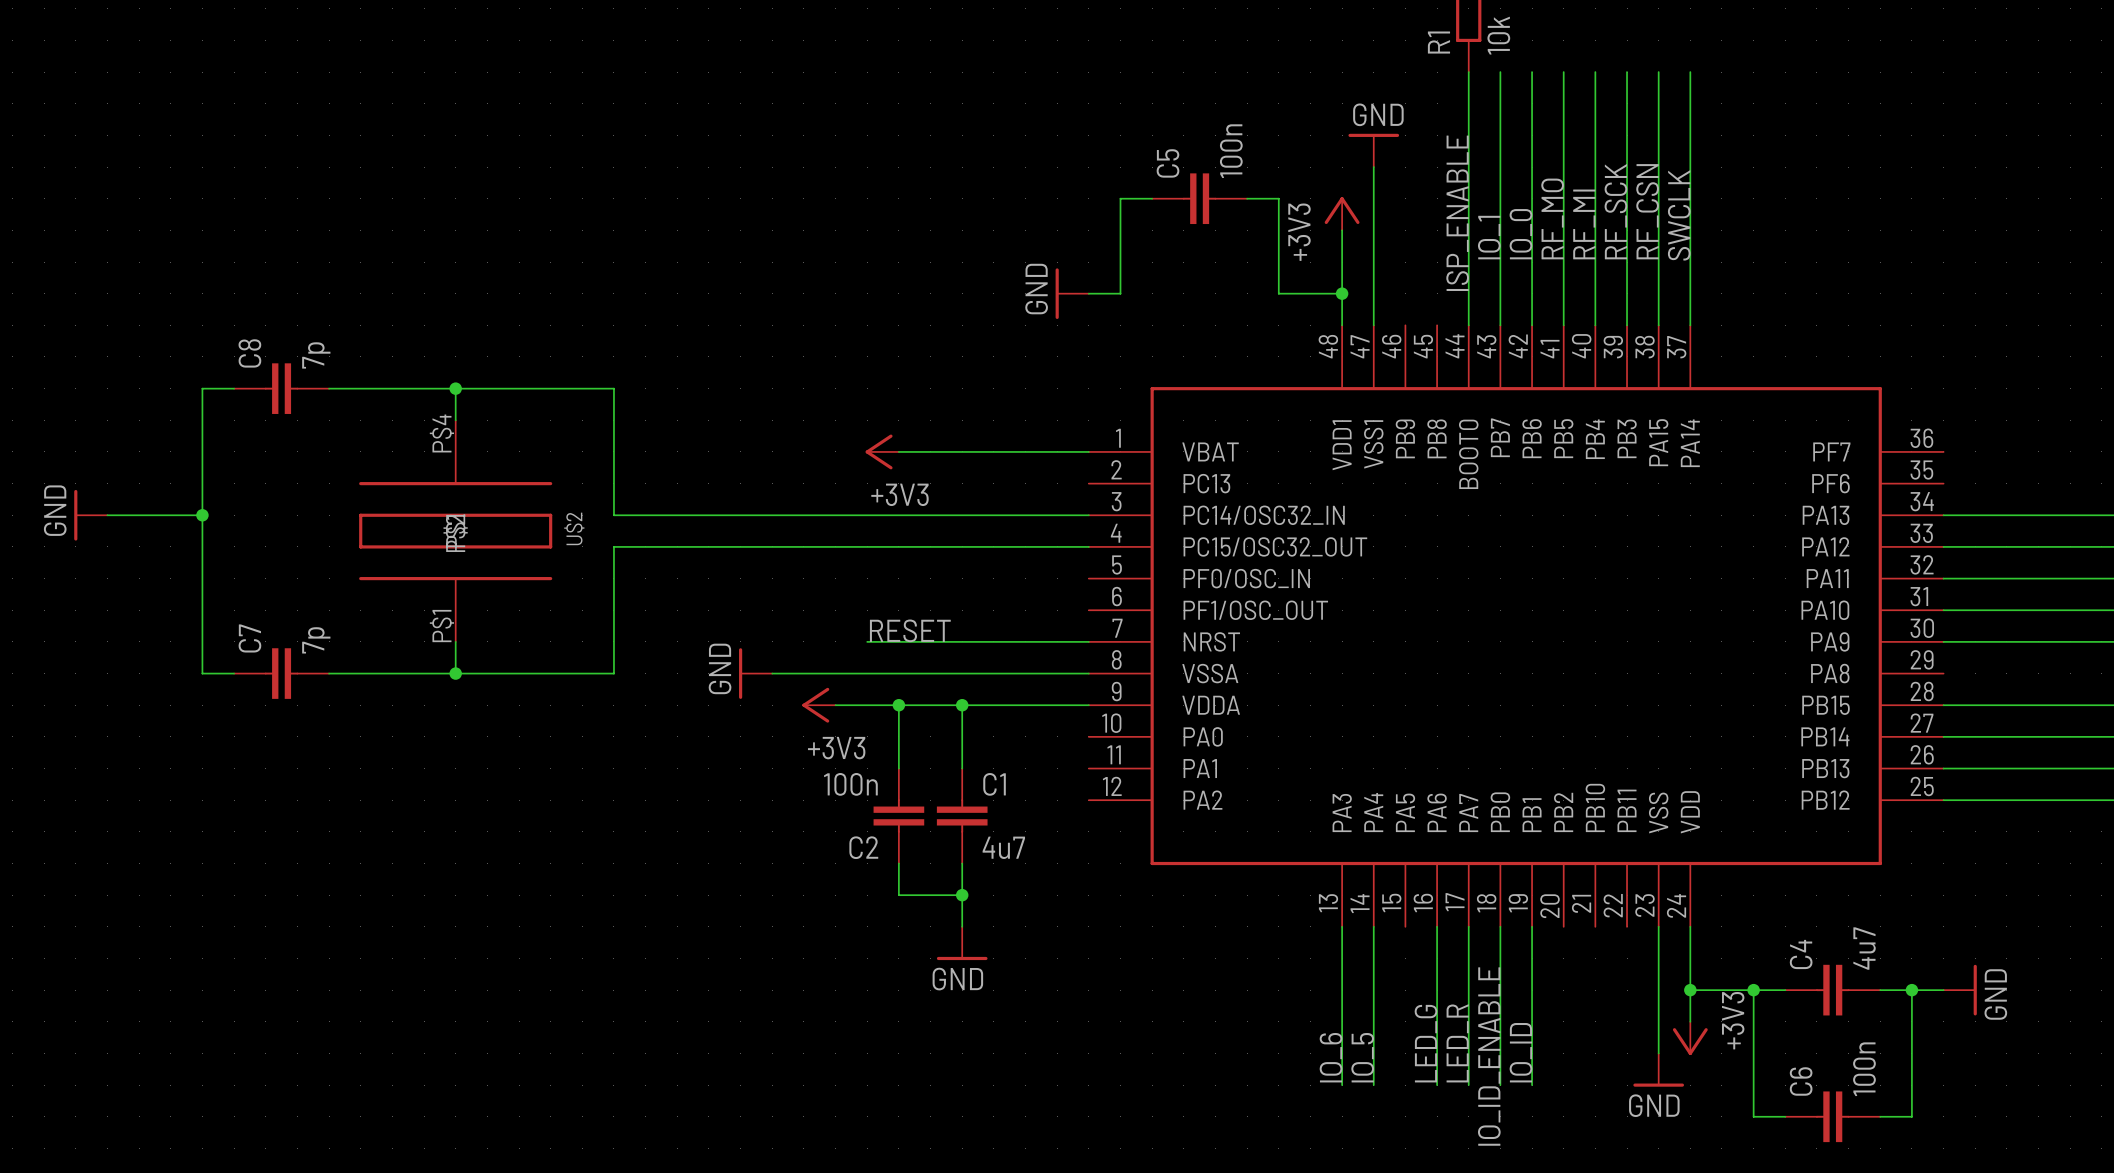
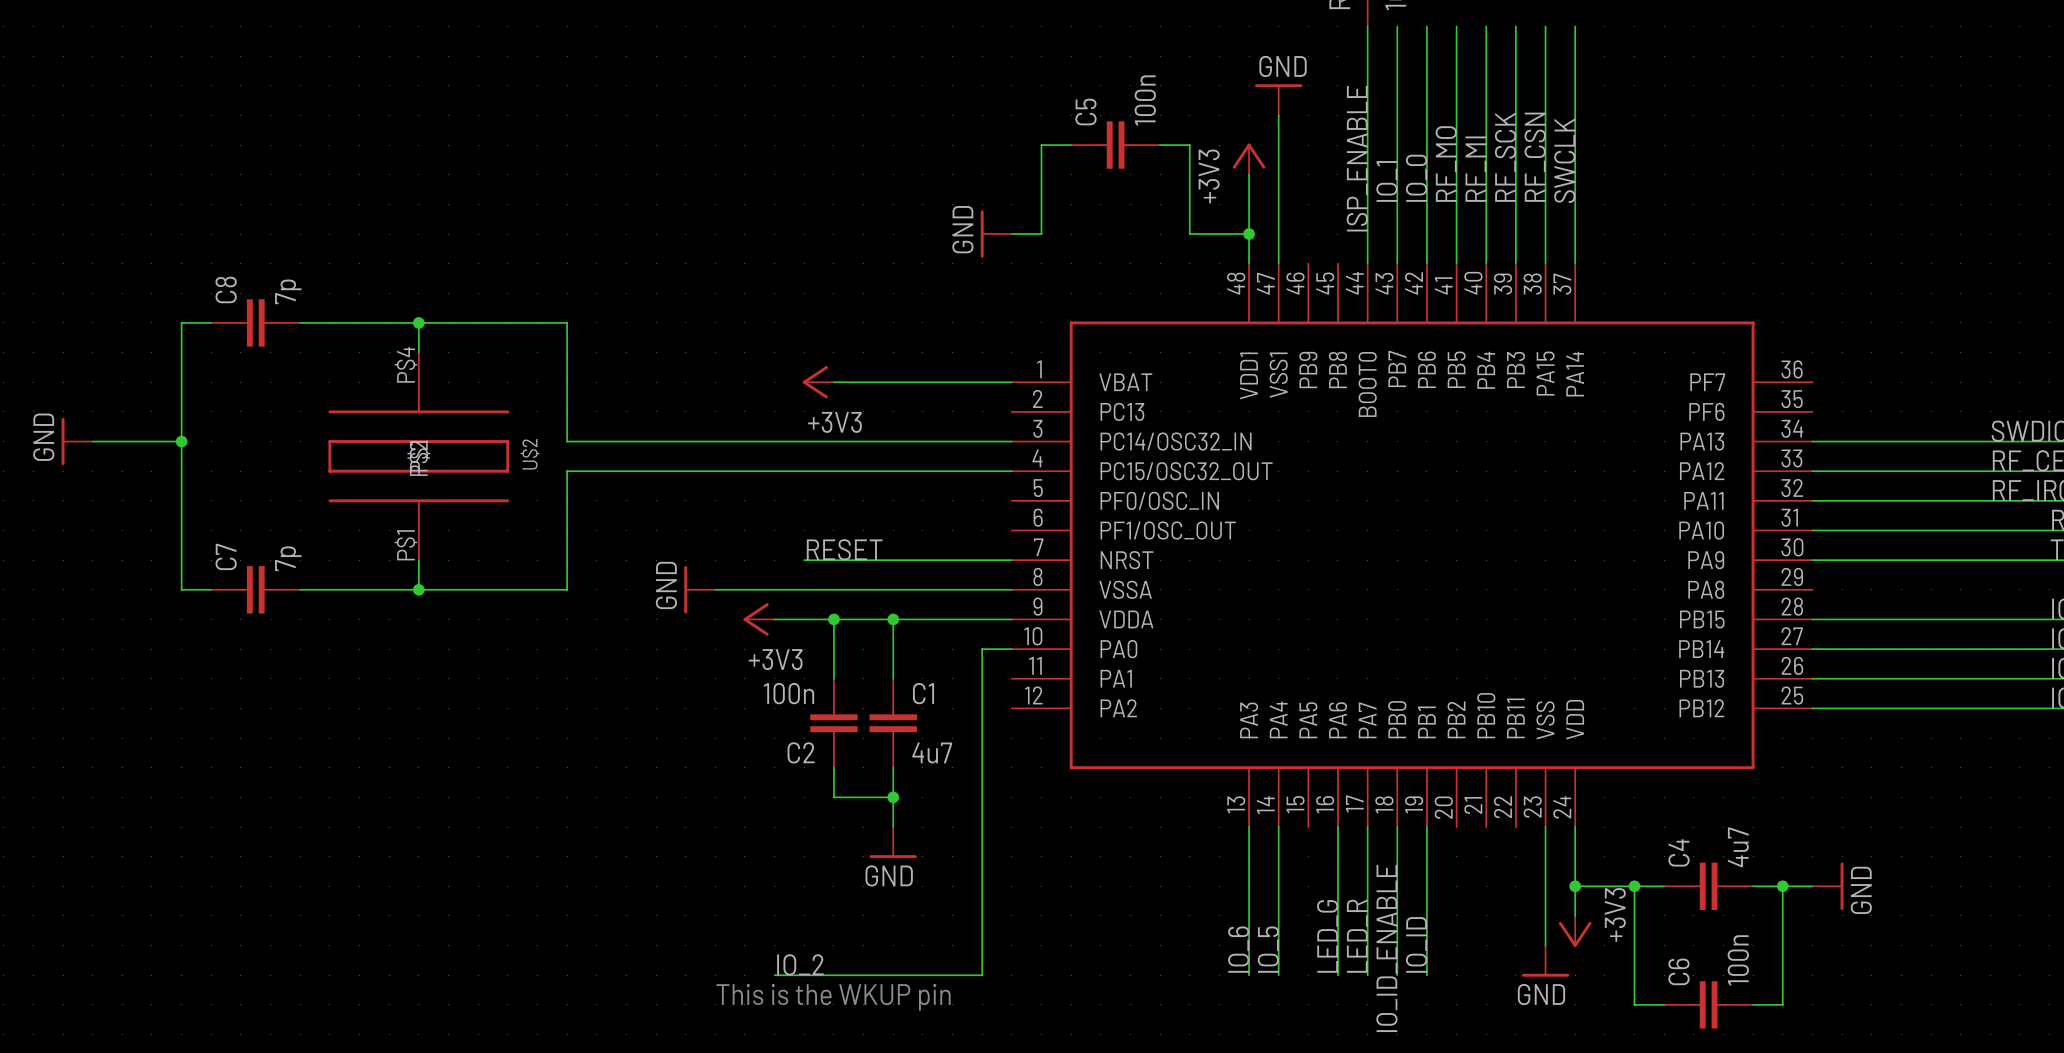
wire: none -> (1011, 649) (982, 649) (982, 975) (774, 975)
label: none -> IO_2 (800, 964)
text: none -> This is the WKUP pin (833, 997)

